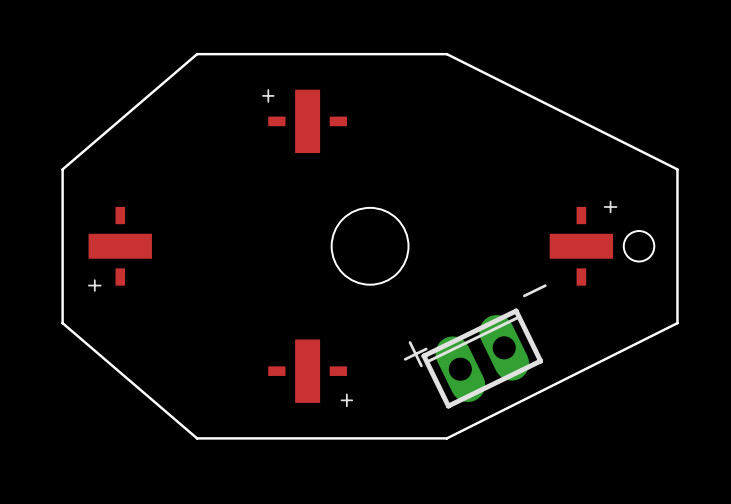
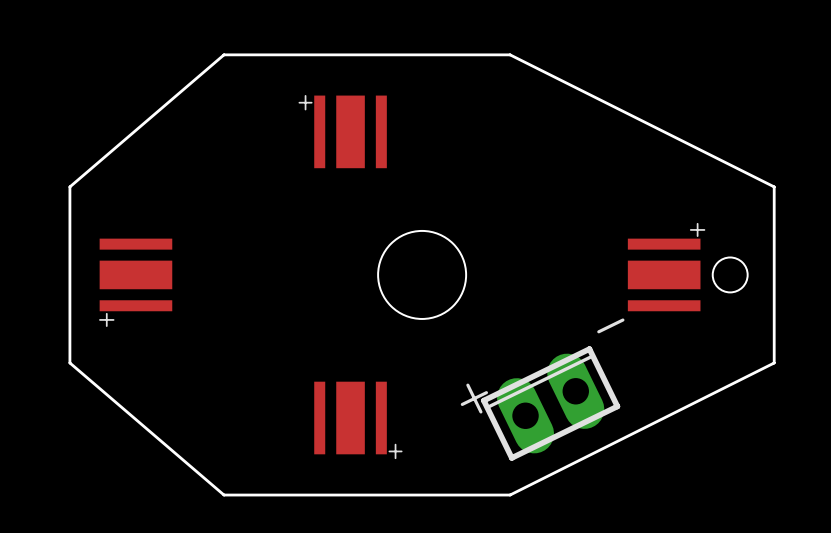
part footprint: [268, 89, 347, 154] -> [314, 95, 387, 169]
part footprint: [88, 206, 152, 286] -> [99, 238, 173, 312]
part footprint: [549, 206, 614, 286] -> [627, 238, 701, 312]
part footprint: [268, 339, 347, 403] -> [314, 381, 387, 455]

